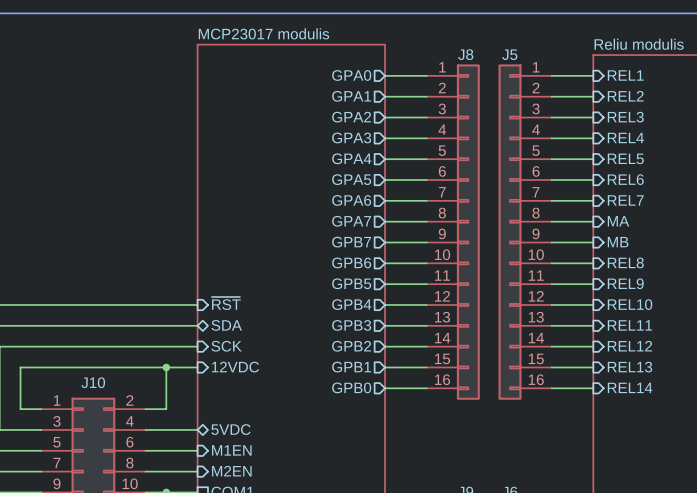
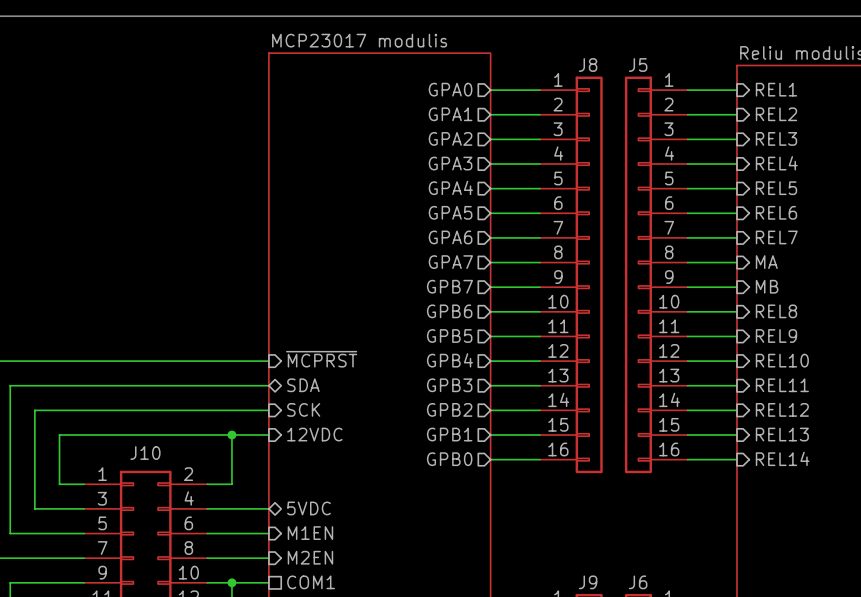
sheet pin: ~{RST} (226, 303) -> ~{MCPRST} (321, 359)

